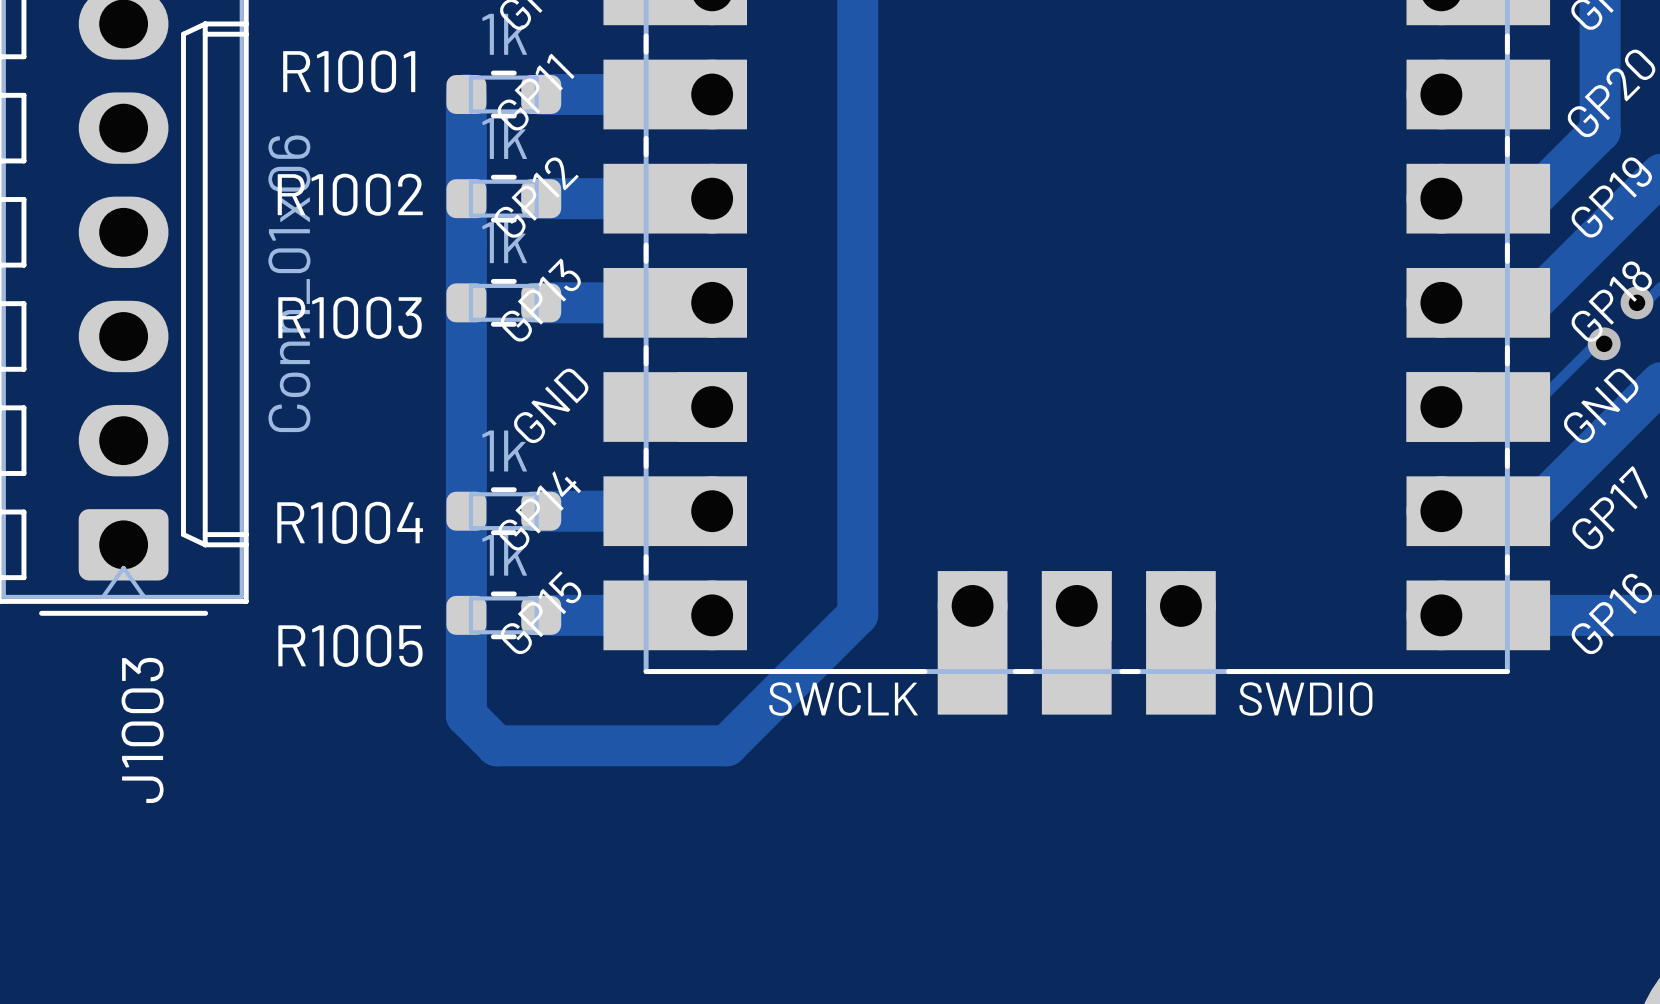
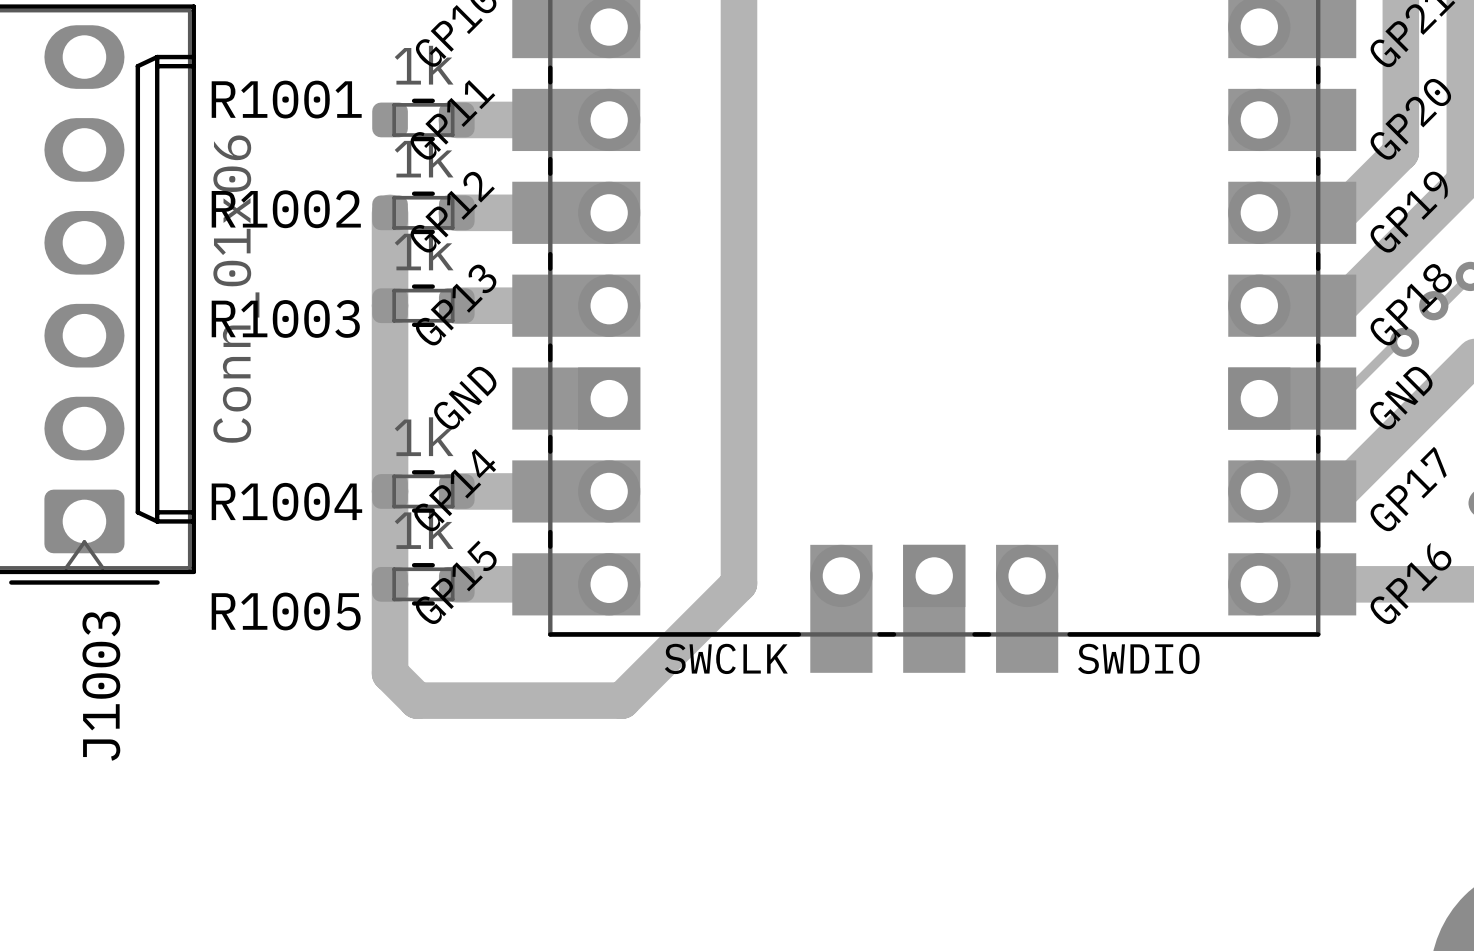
track: (466, 94) (466, 198) -> none

